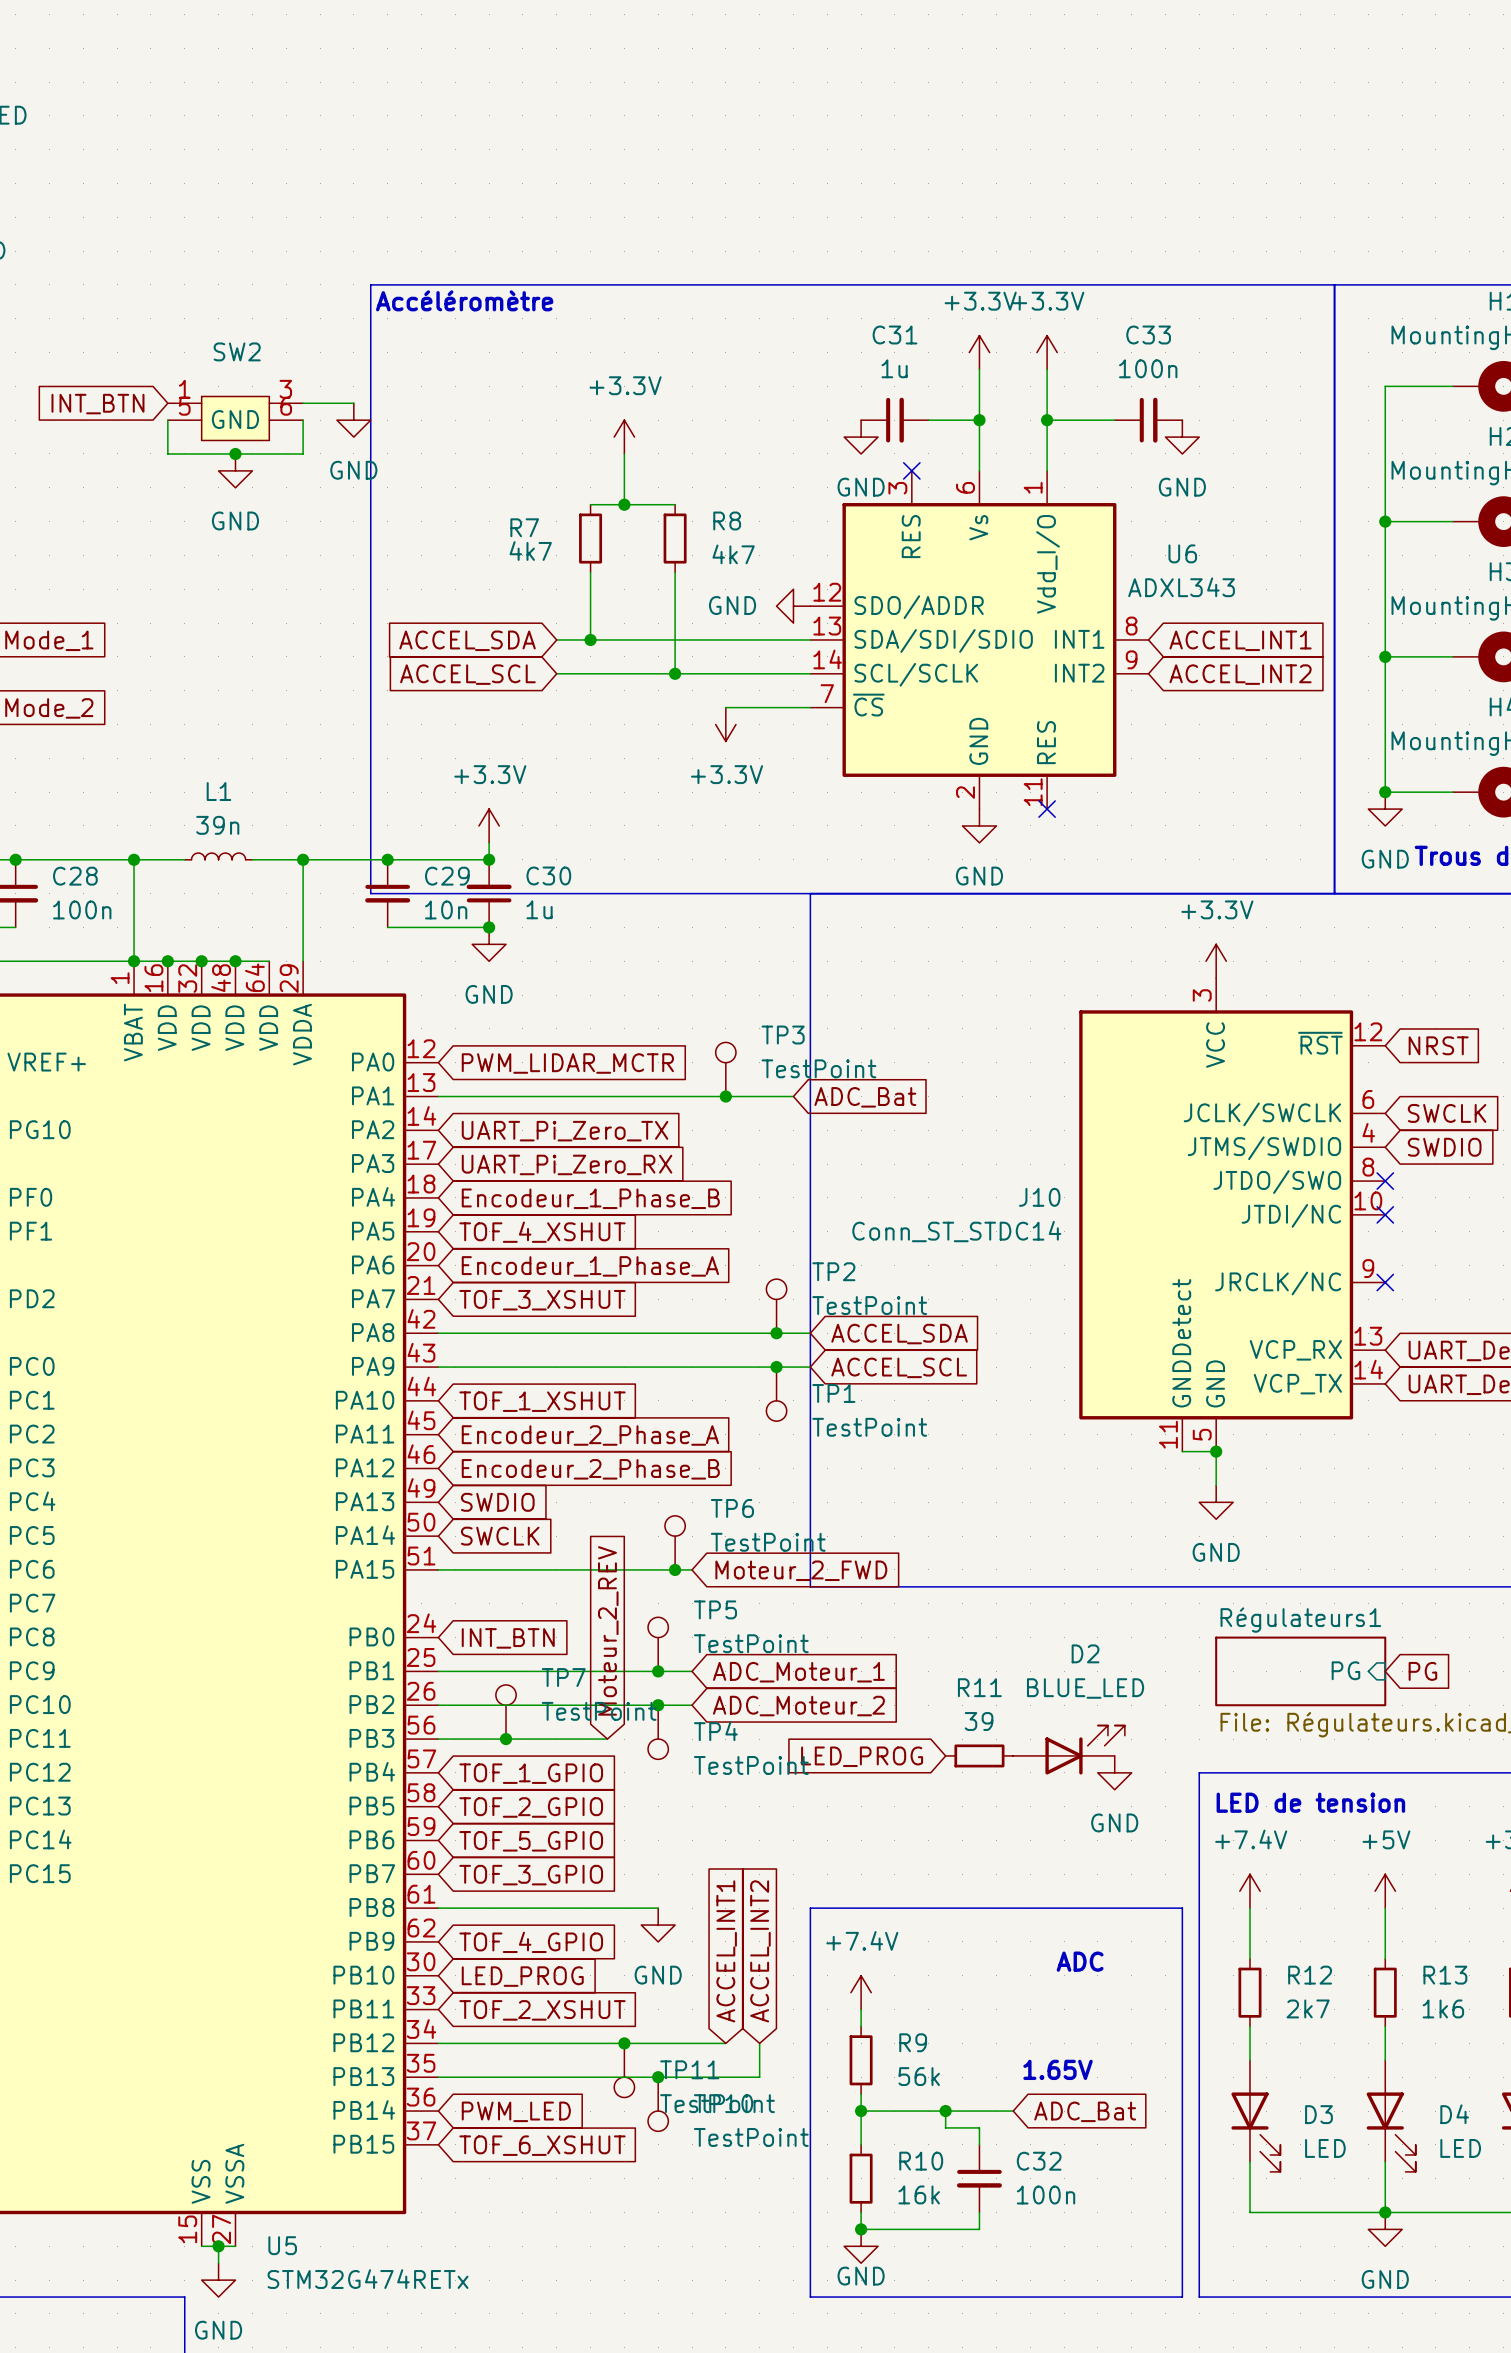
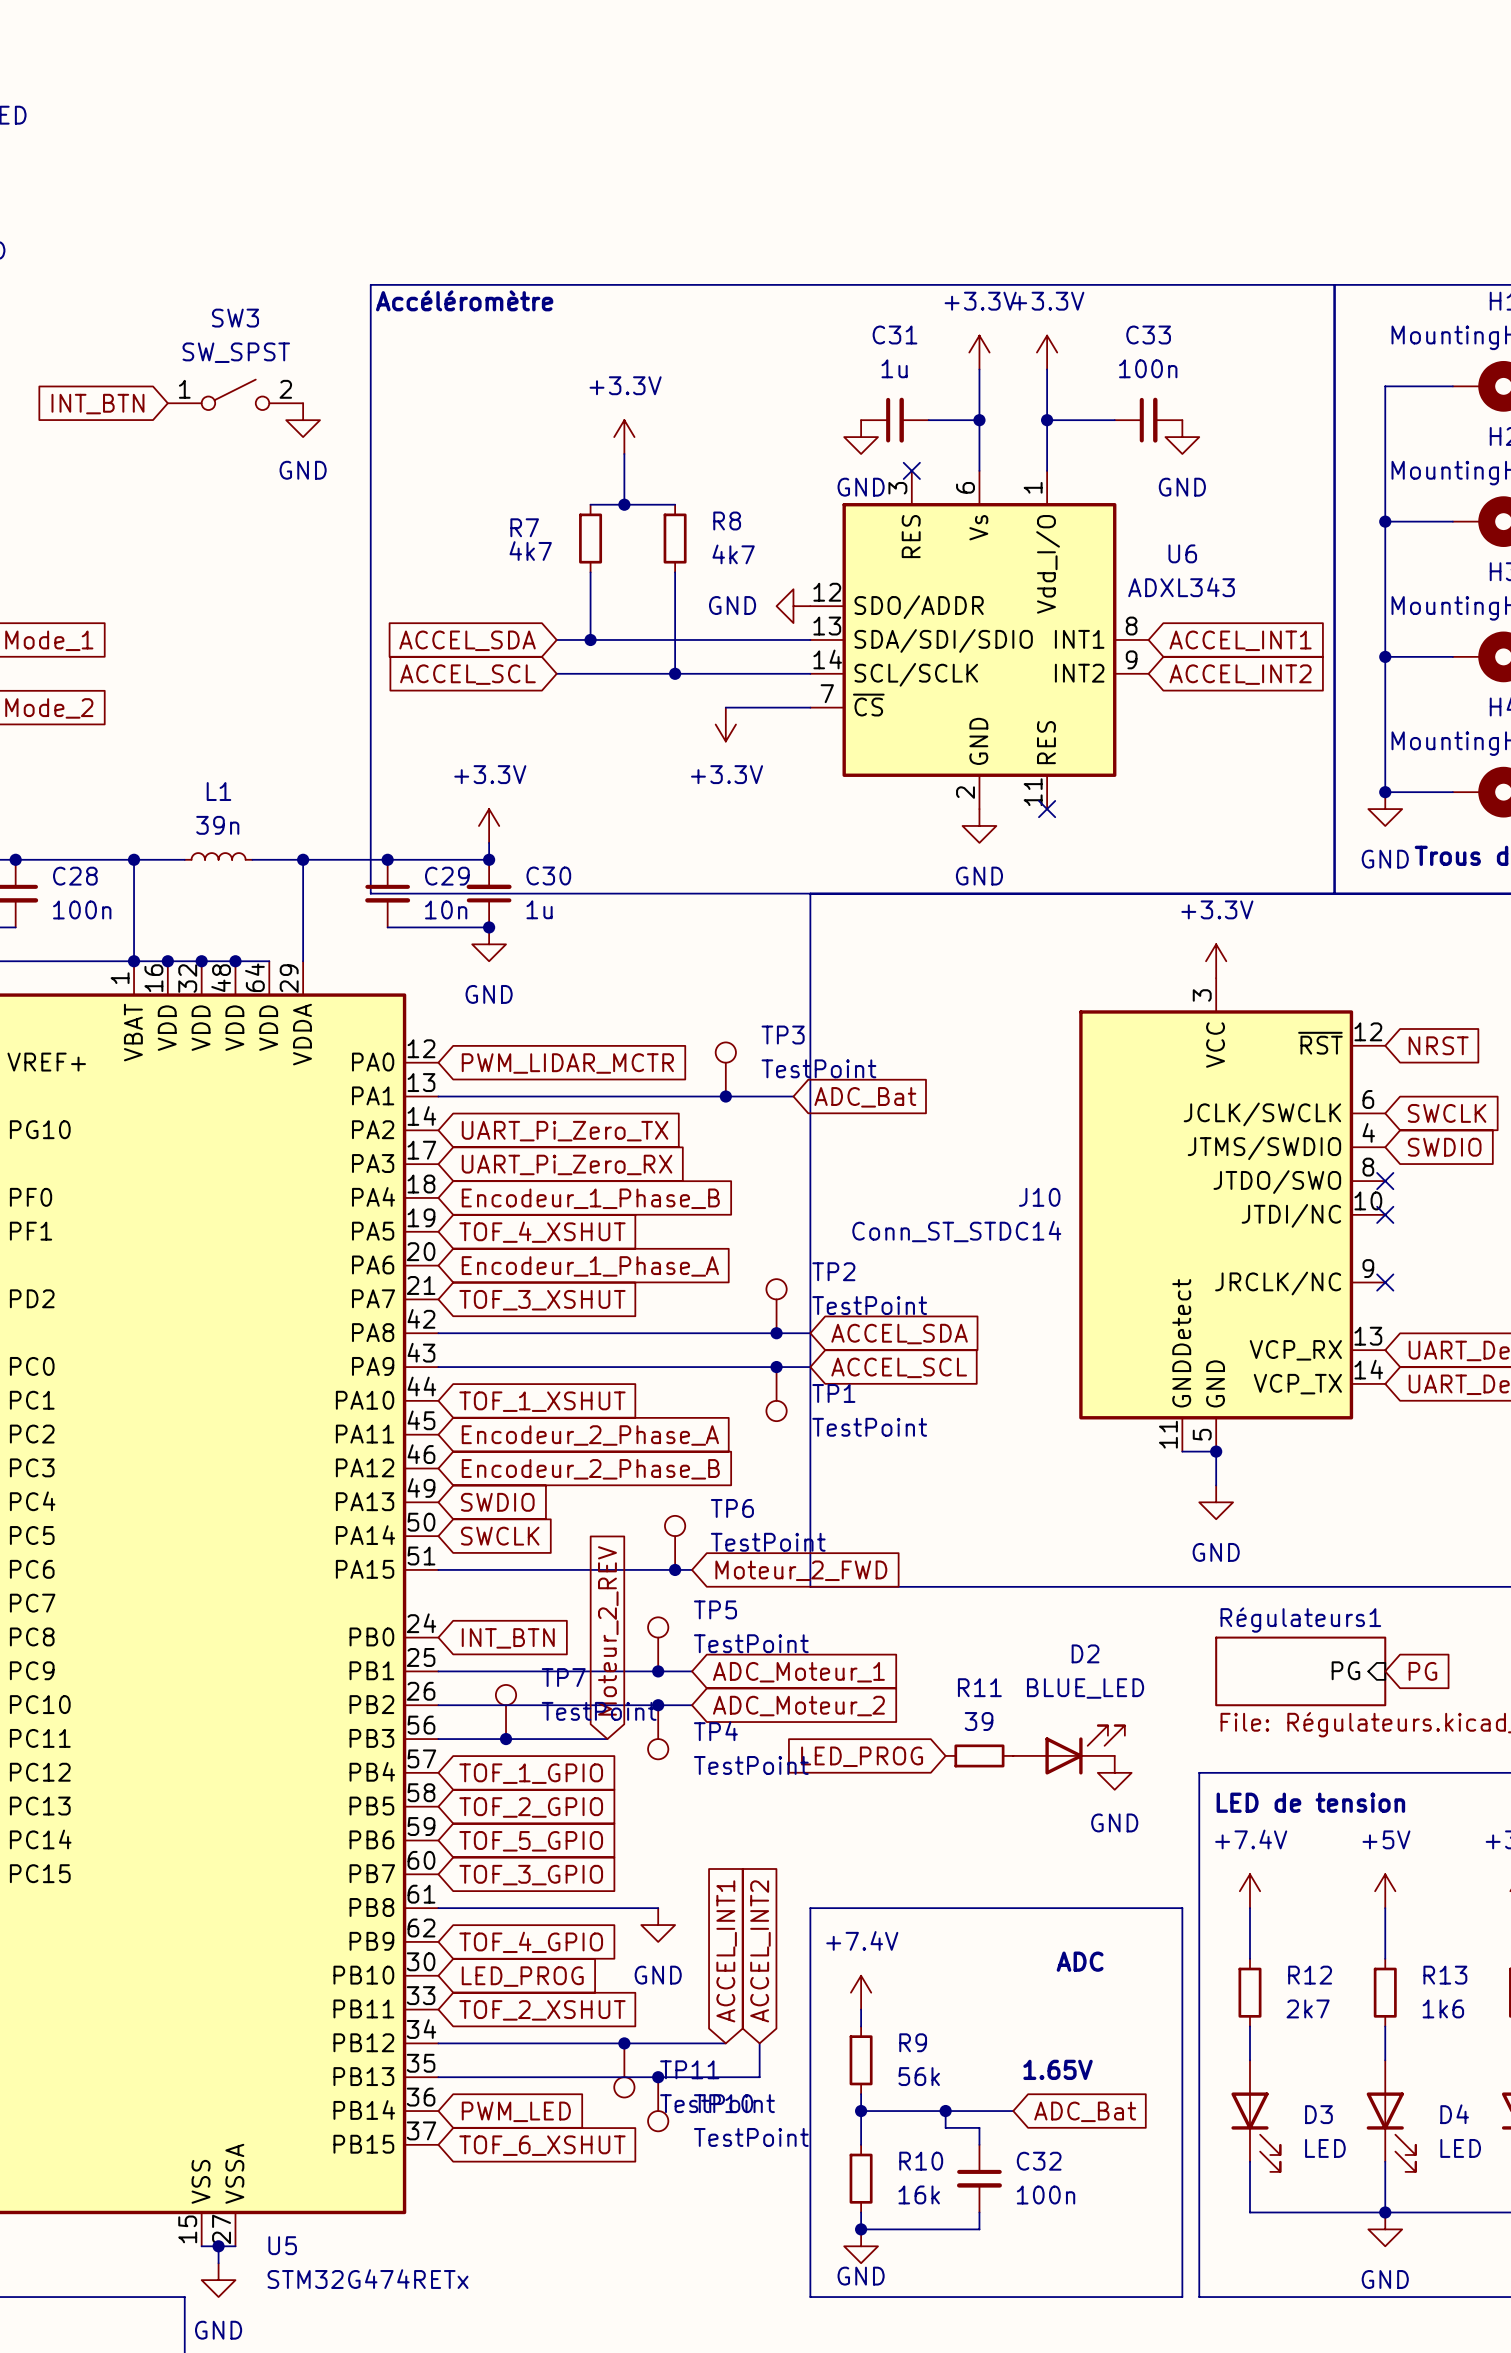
SW3: none -> SW_SPST (235, 394)
wire: (303, 403) (353, 403) -> none
SW2: (235, 418) -> none
wire: (167, 420) (167, 453) (303, 453) (303, 420) -> none
power symbol: none -> GND (303, 420)
power symbol: GND (353, 420) -> none
junction: (235, 453) -> none
power symbol: GND (235, 470) -> none

